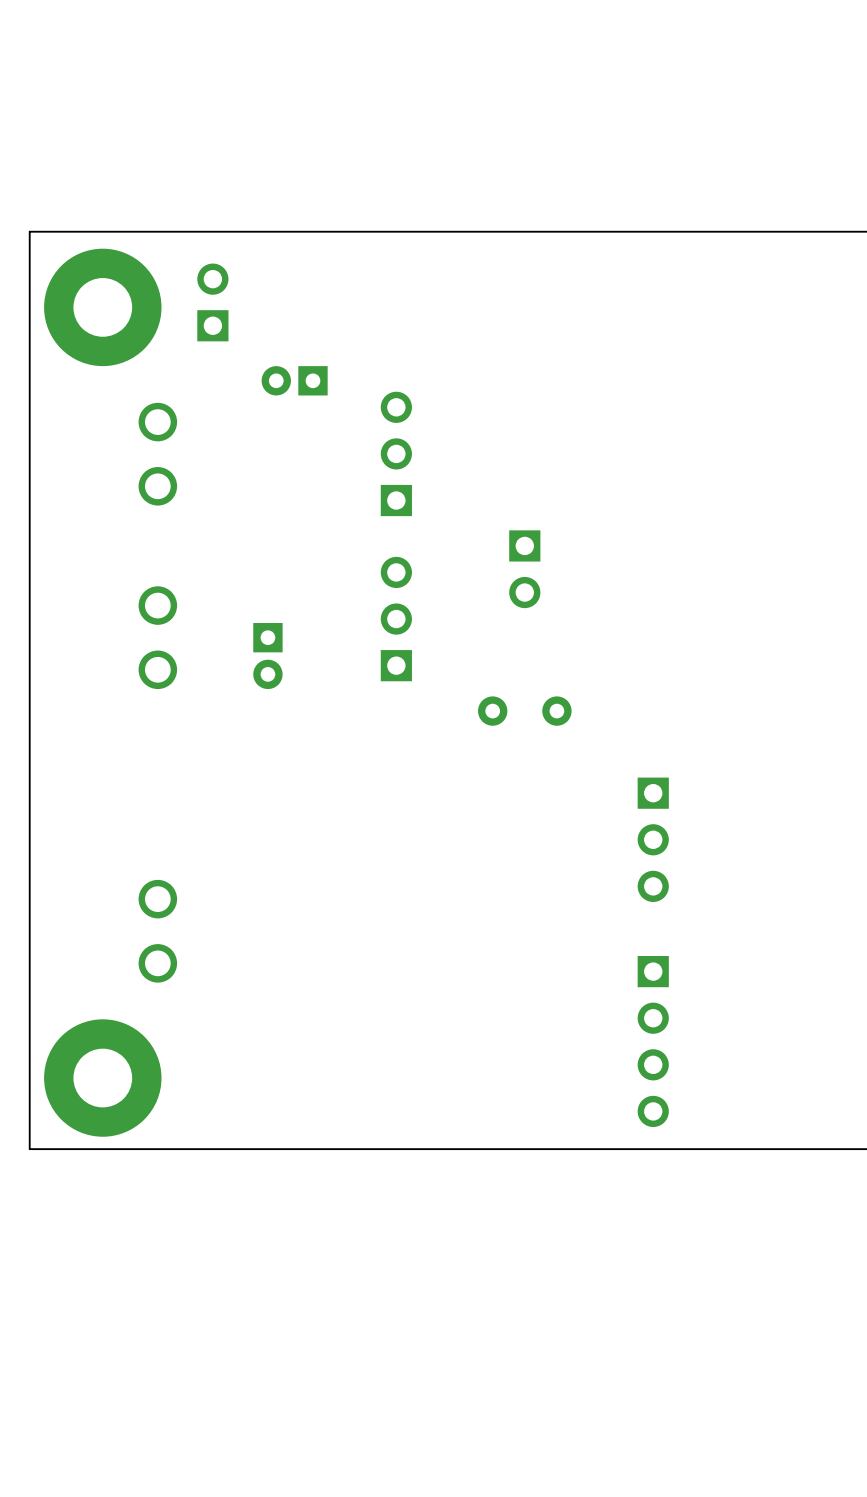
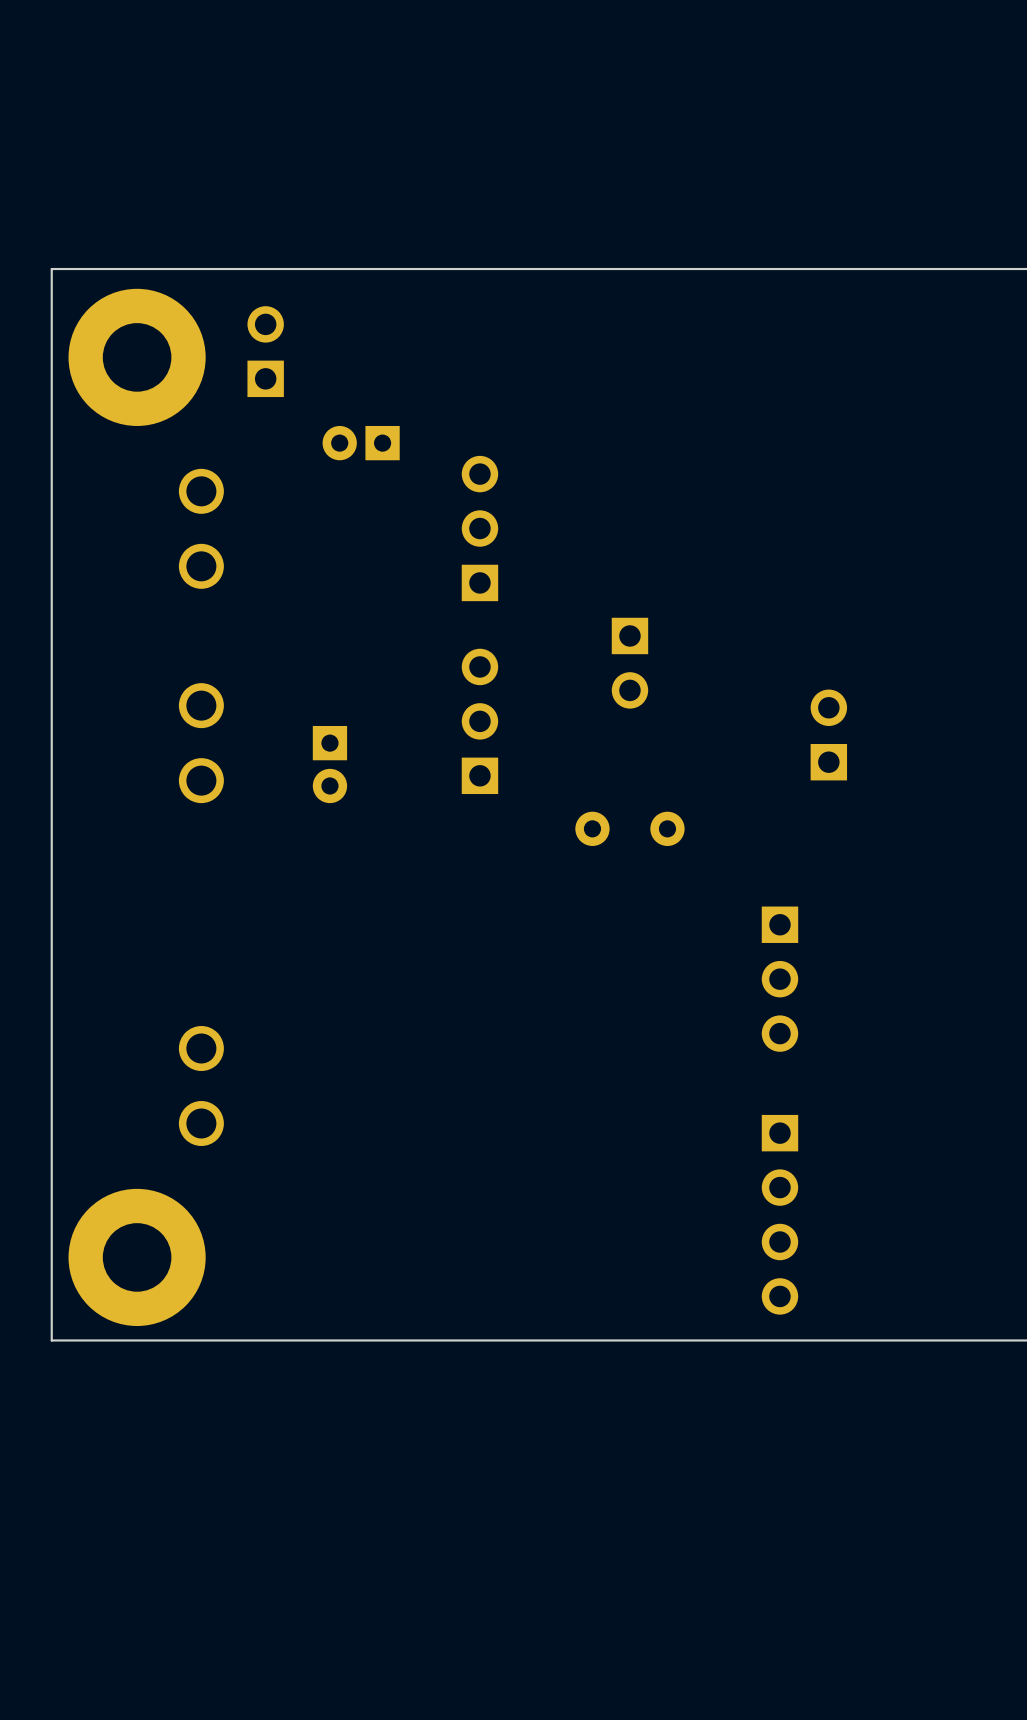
part: none -> (828, 734)

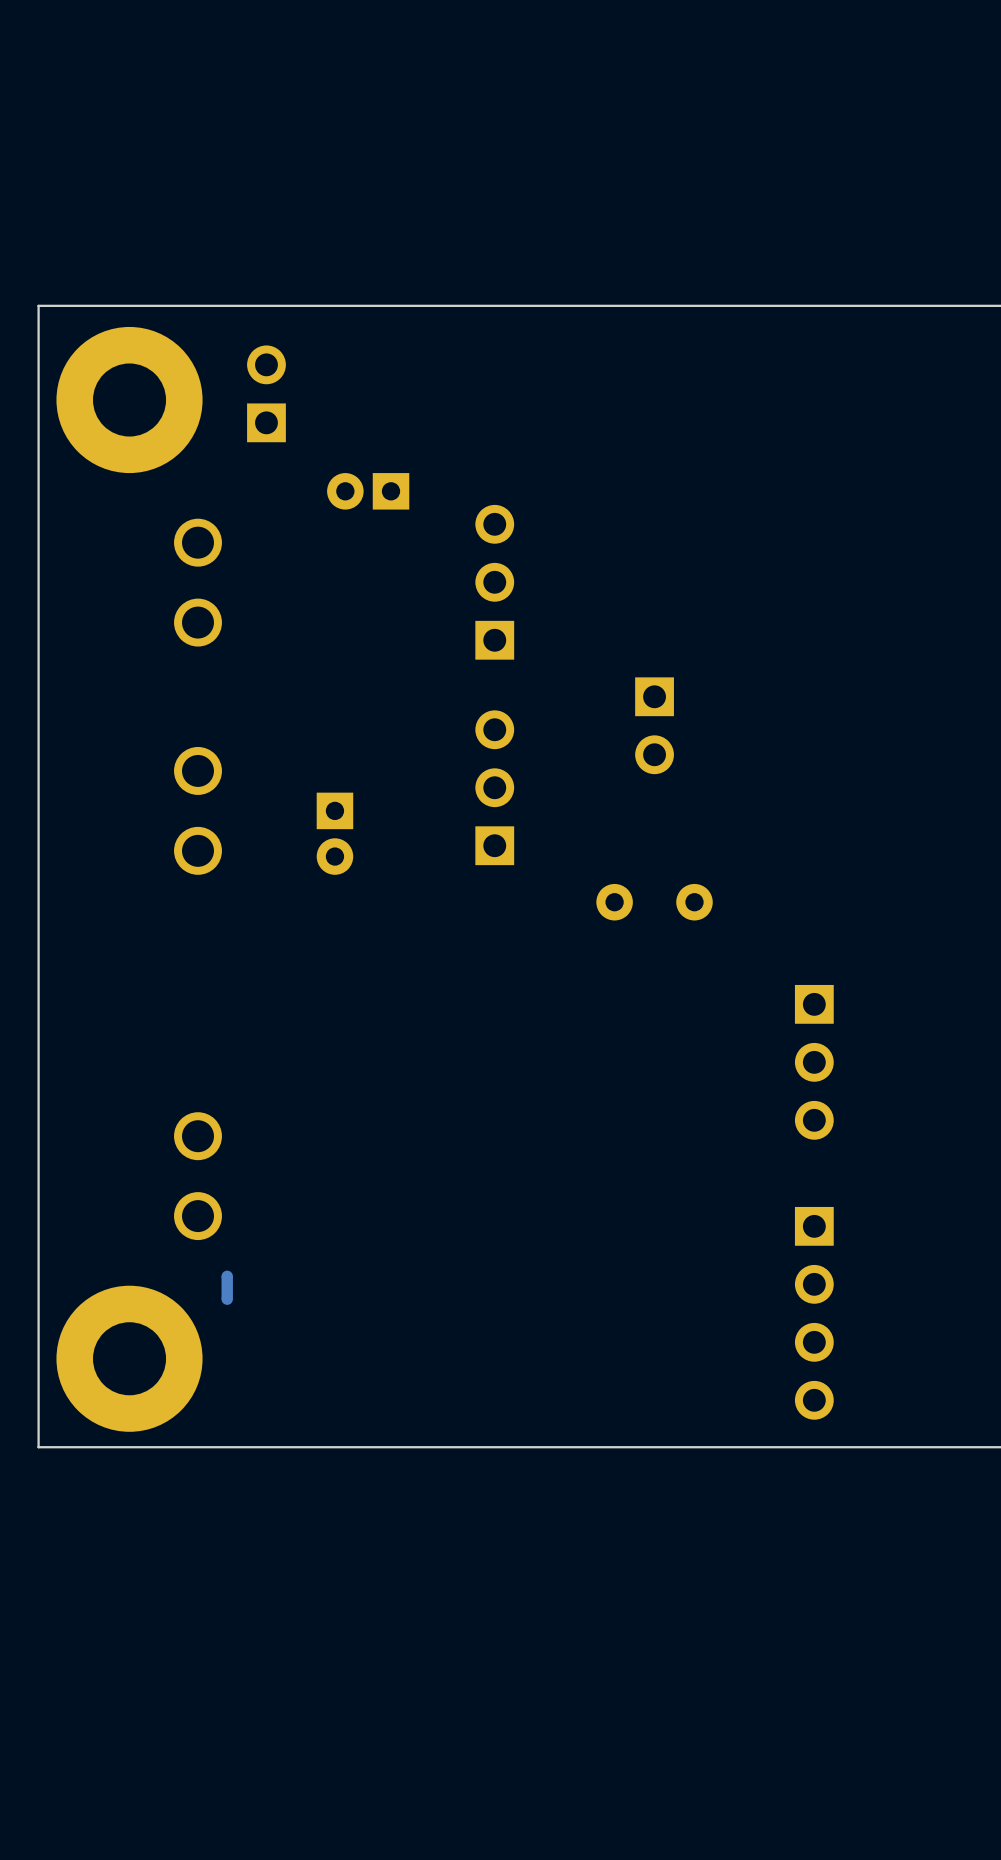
part: (828, 734) -> none
part: none -> (227, 1287)

